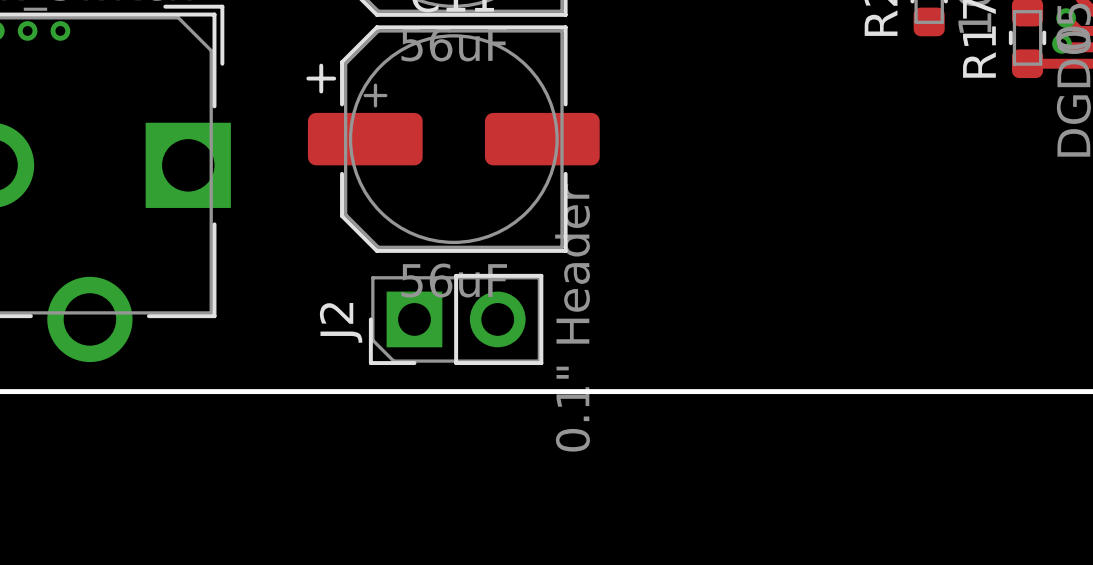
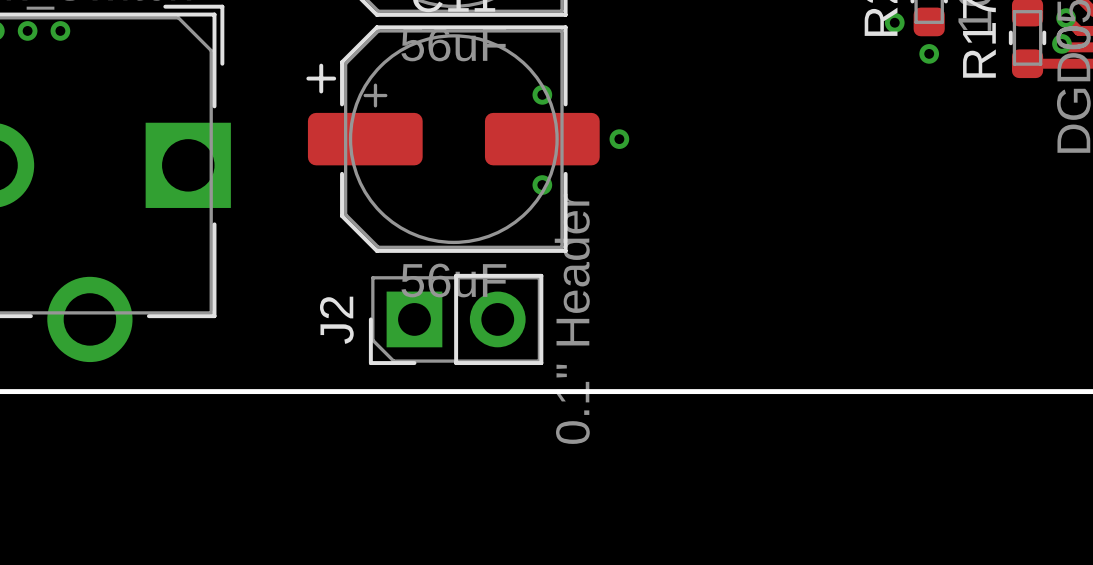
via: none -> (894, 22)
via: none -> (929, 53)
via: none -> (542, 94)
via: none -> (619, 139)
via: none -> (542, 185)

